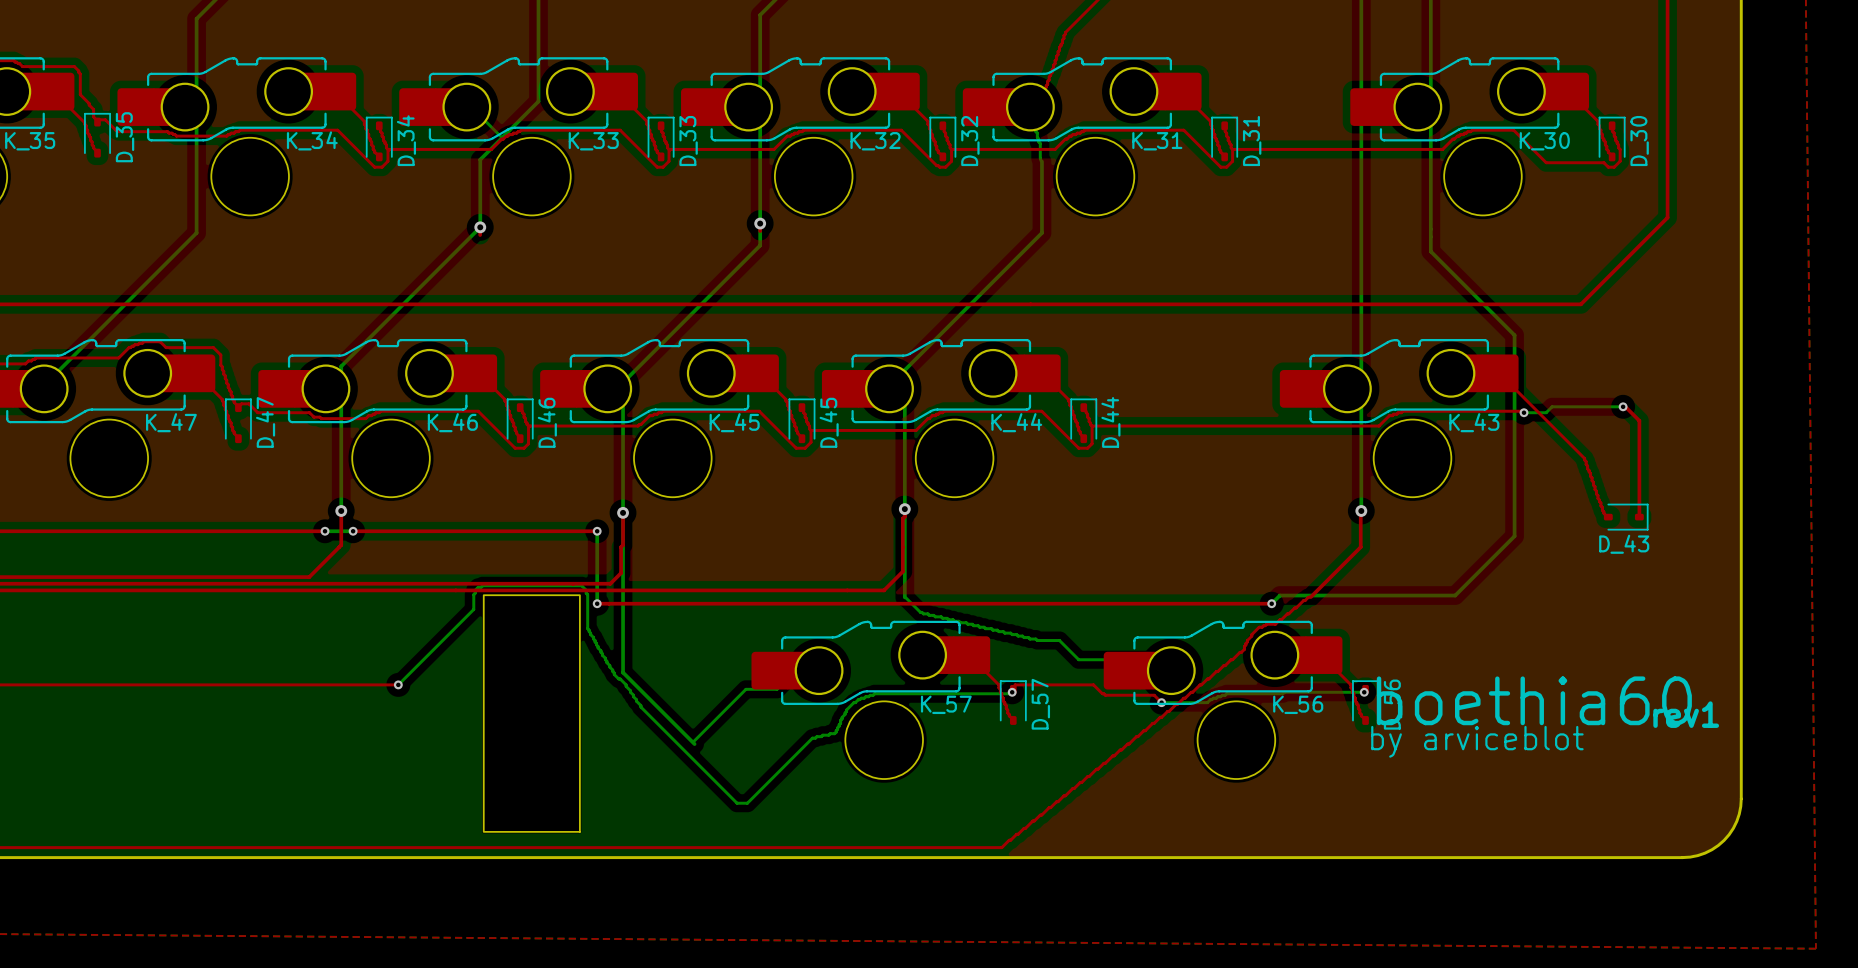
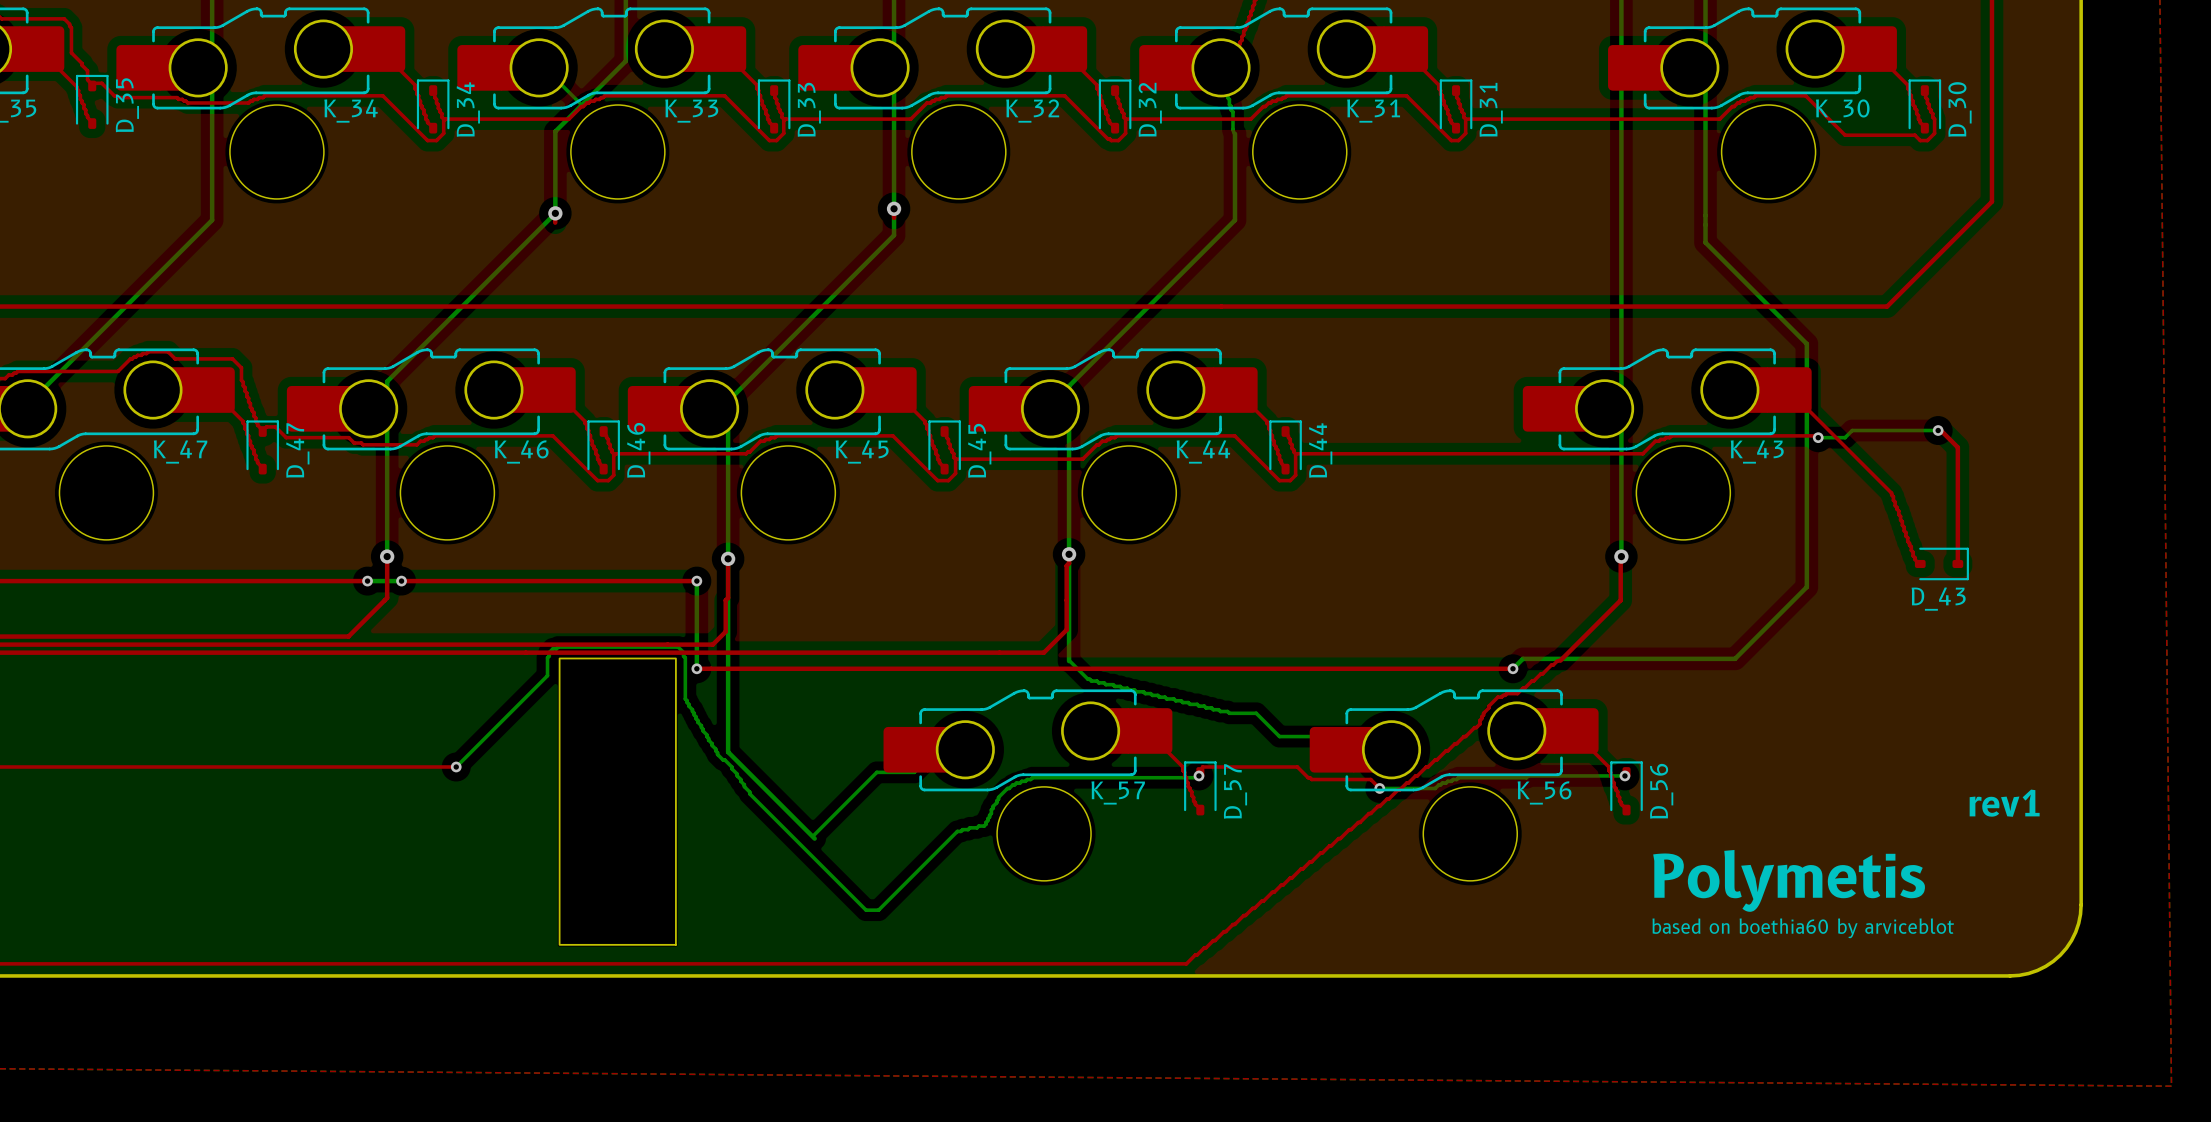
text: boethia60 (1534, 700) -> none
text: by arviceblot (1477, 741) -> none
text: none -> Polymetis (1789, 880)
text: none -> based on boethia60 by arviceblot (1803, 928)

